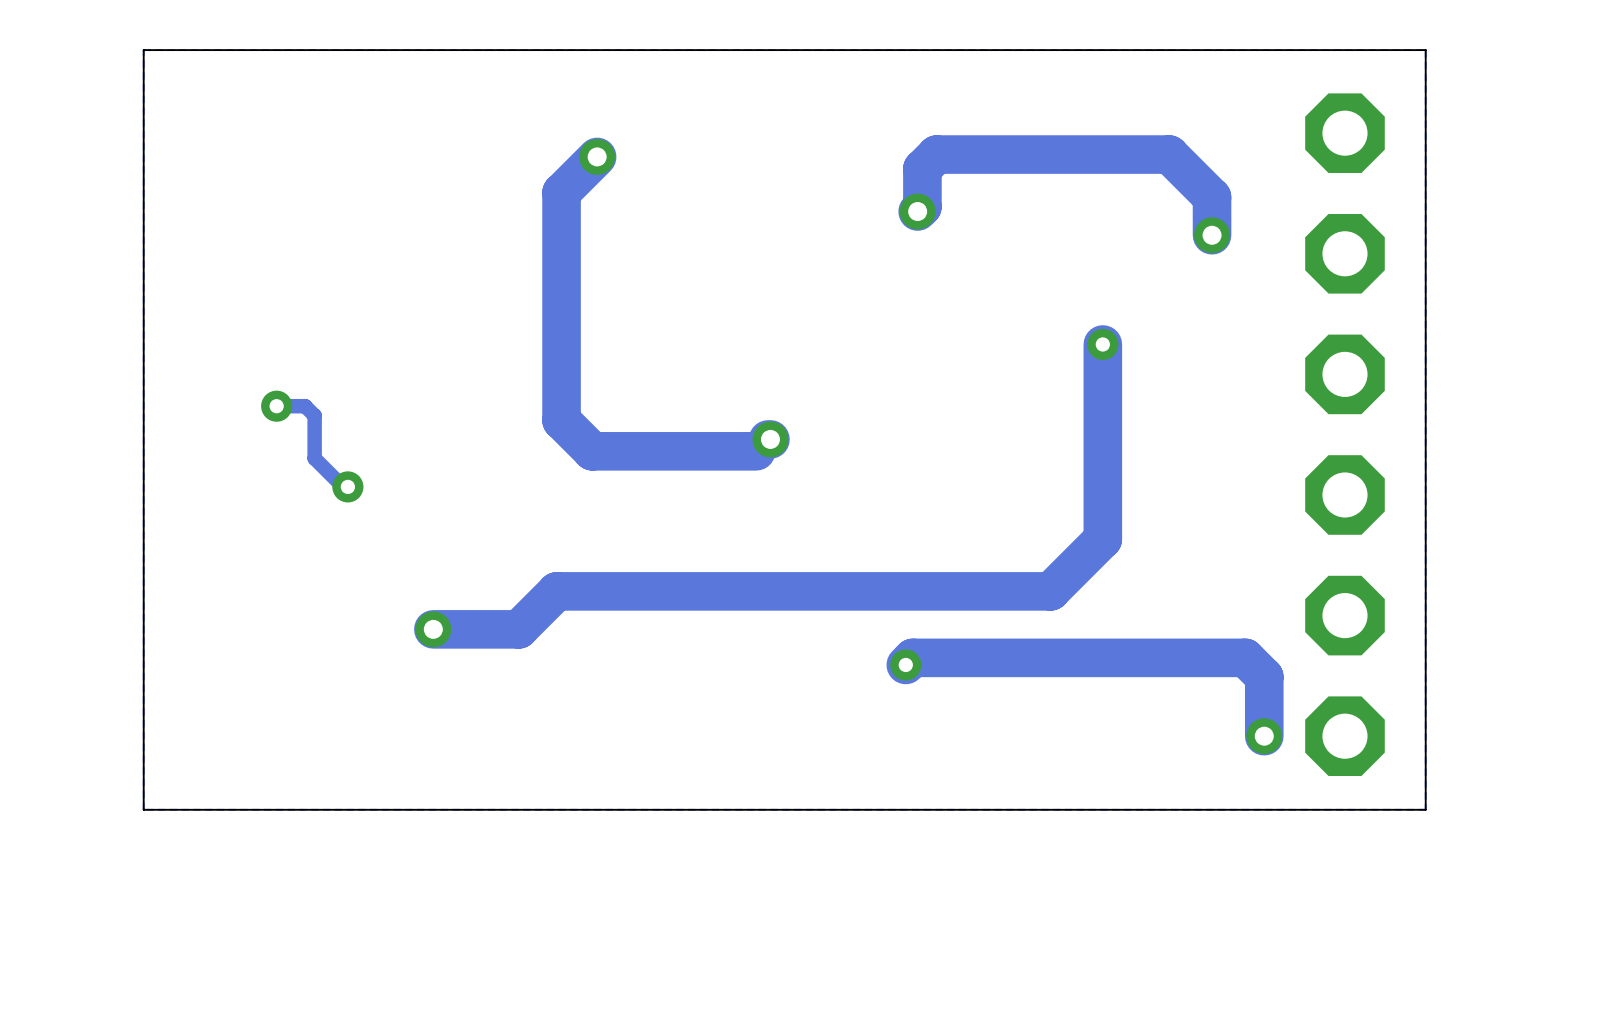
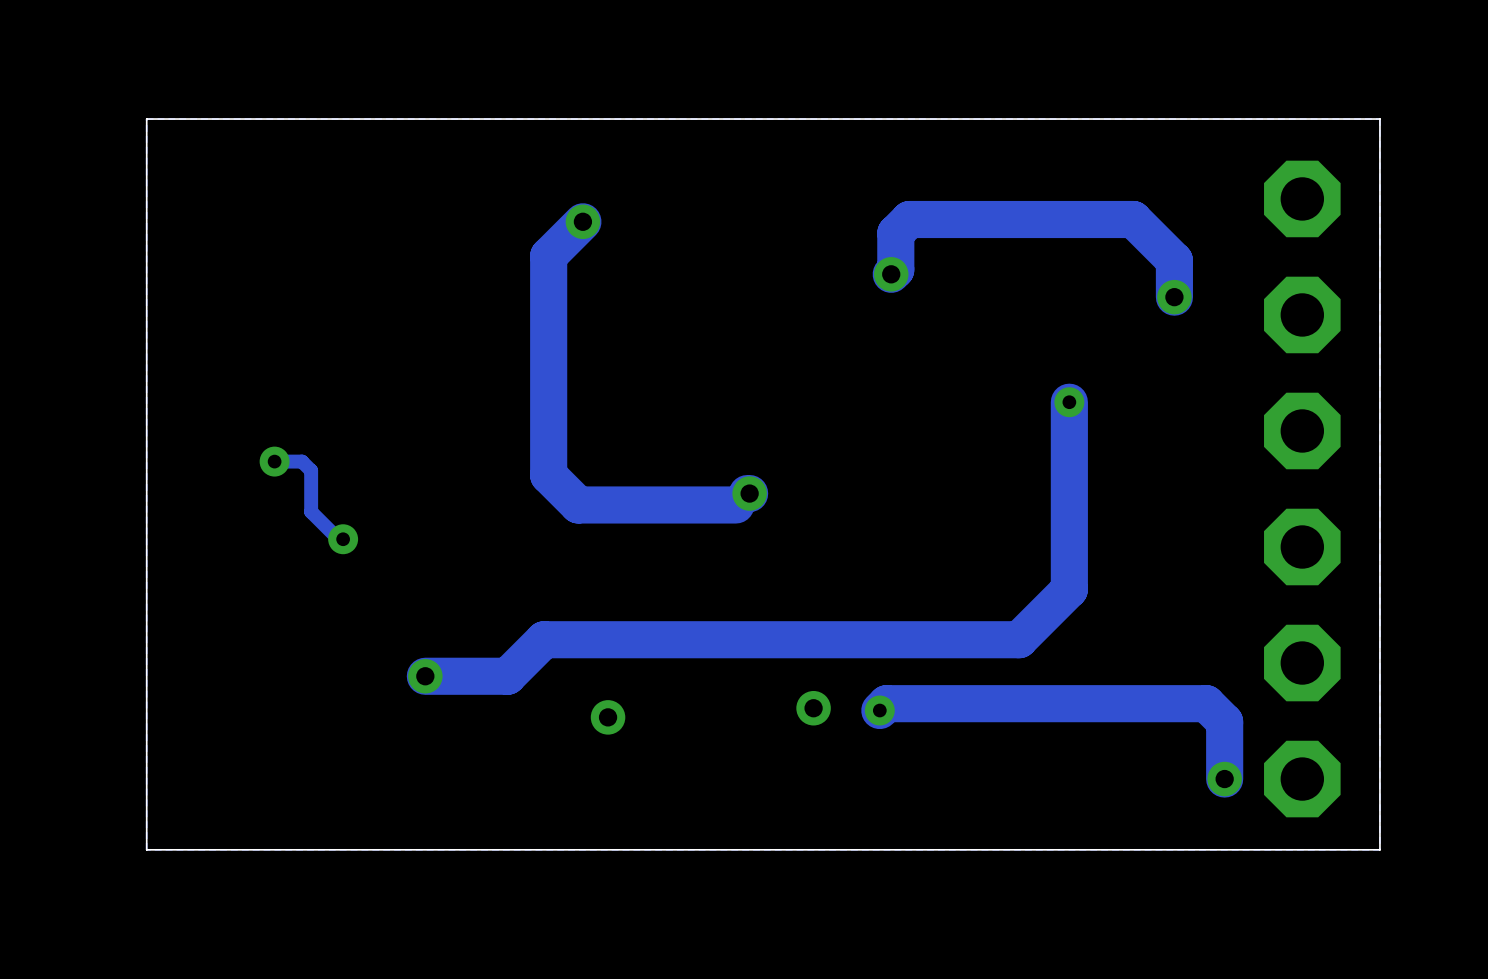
via: none -> (813, 708)
via: none -> (608, 717)

